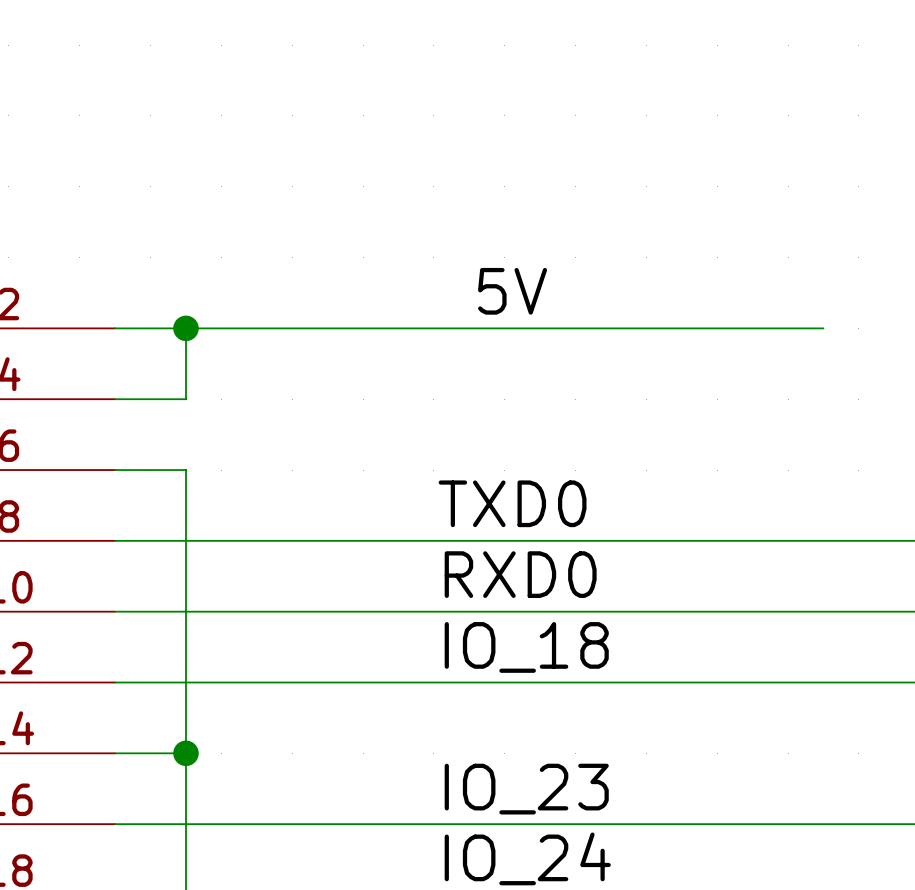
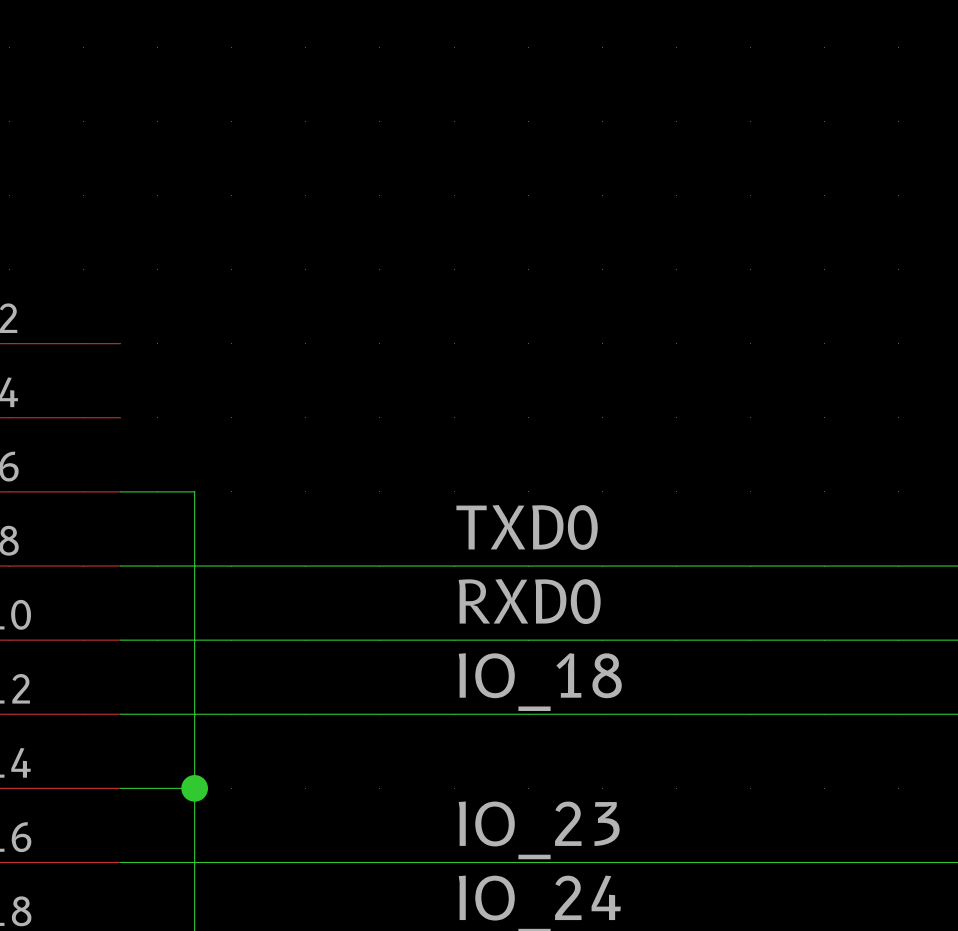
label: 5V (512, 291) -> none
wire: (115, 328) (823, 328) -> none
wire: (185, 328) (185, 399) (115, 399) -> none
junction: (185, 328) -> none

